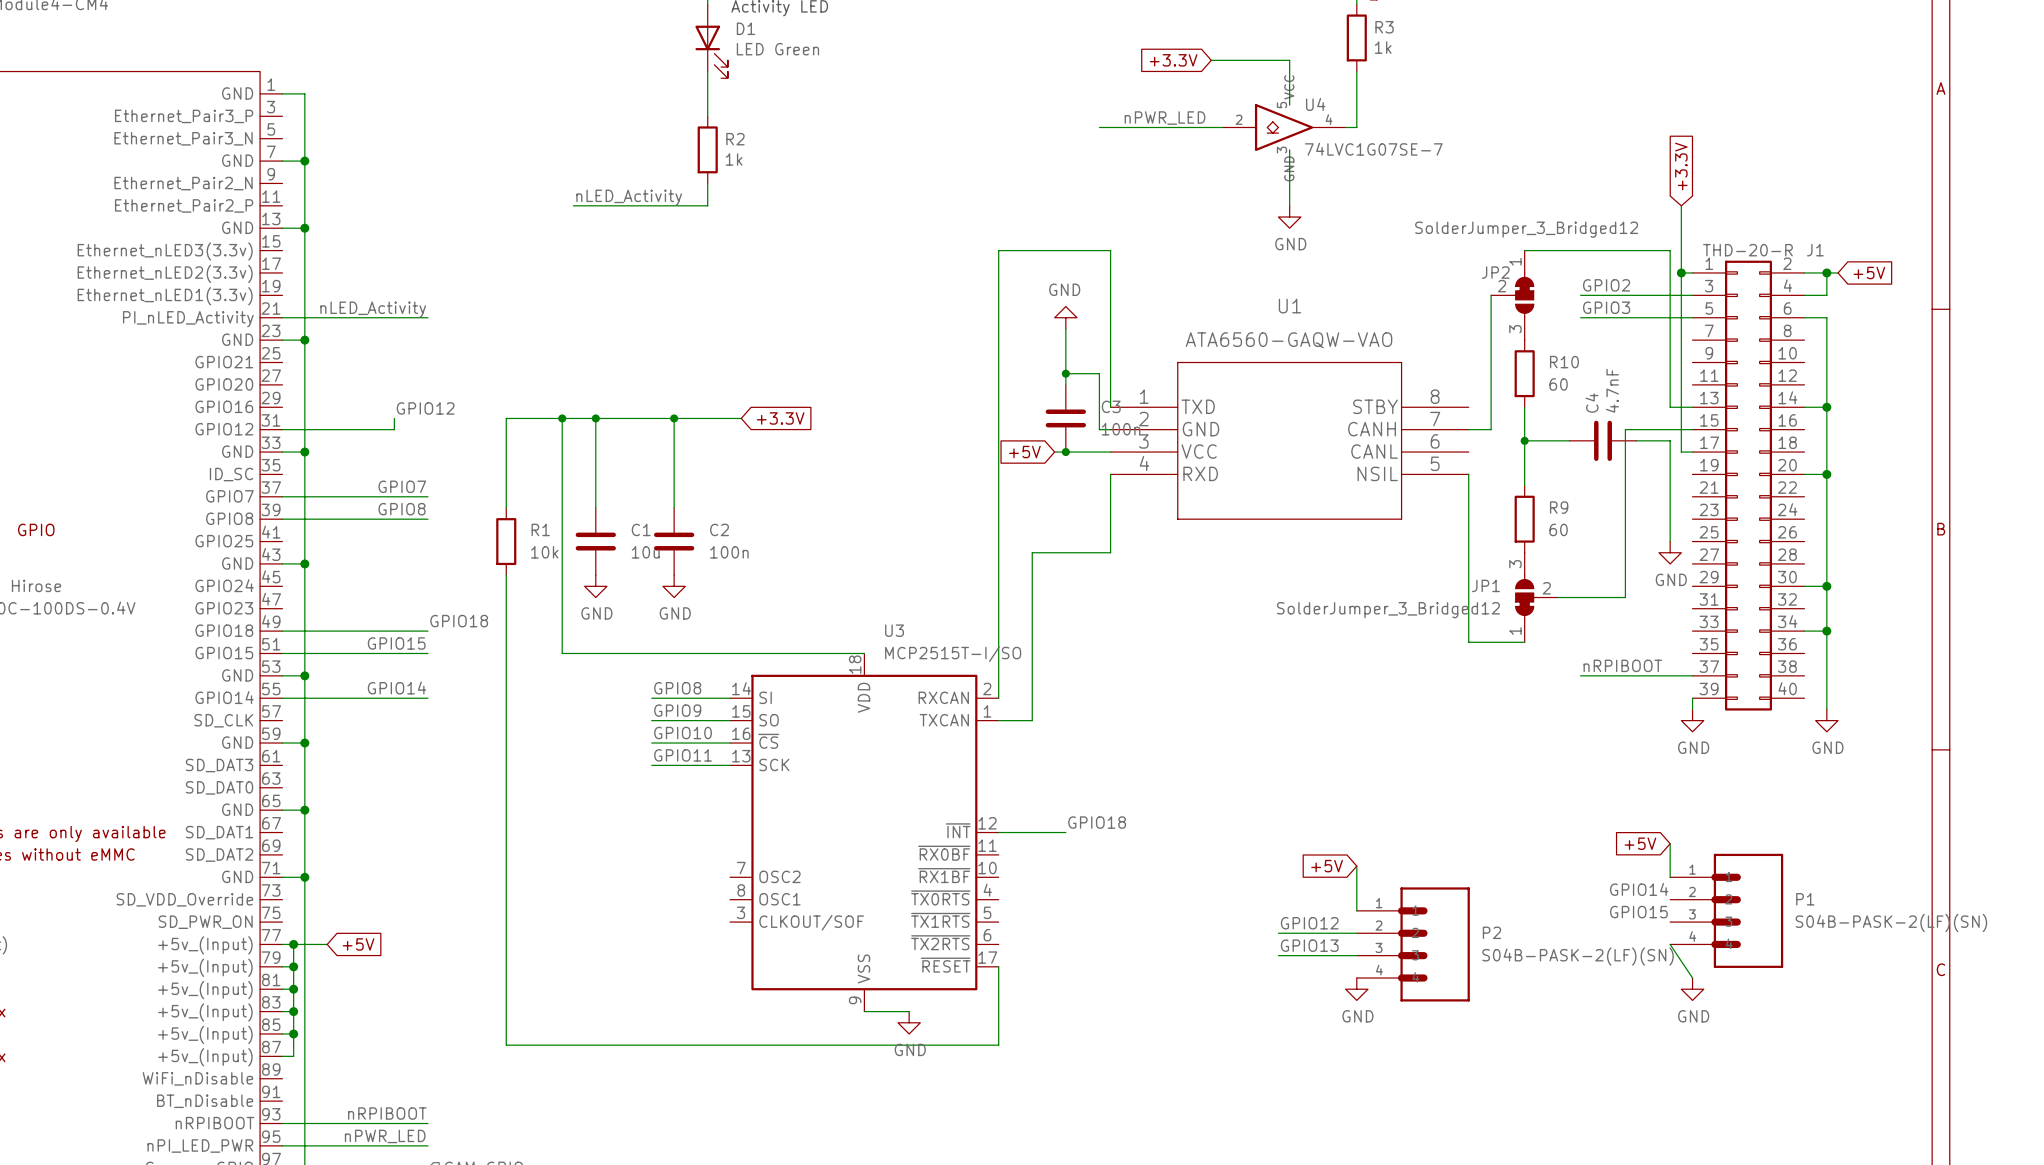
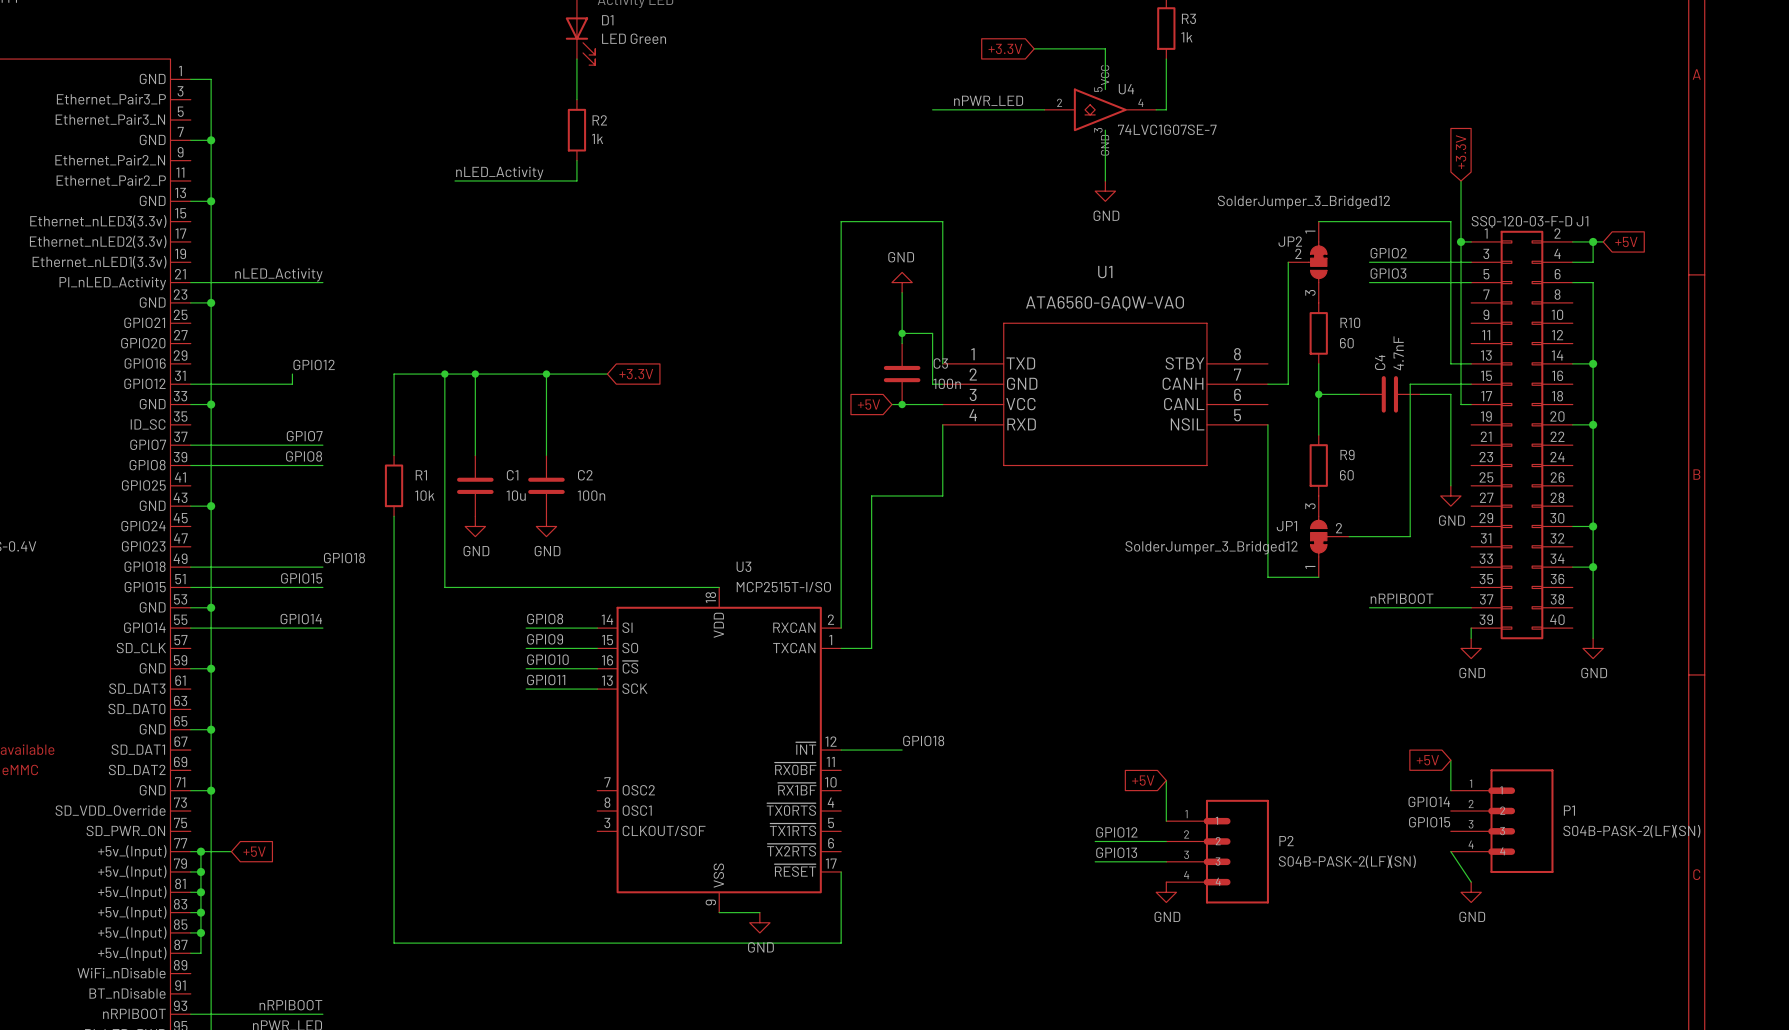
J1 value: THD-20-R (1747, 250) -> SSQ-120-03-F-D (1521, 222)

